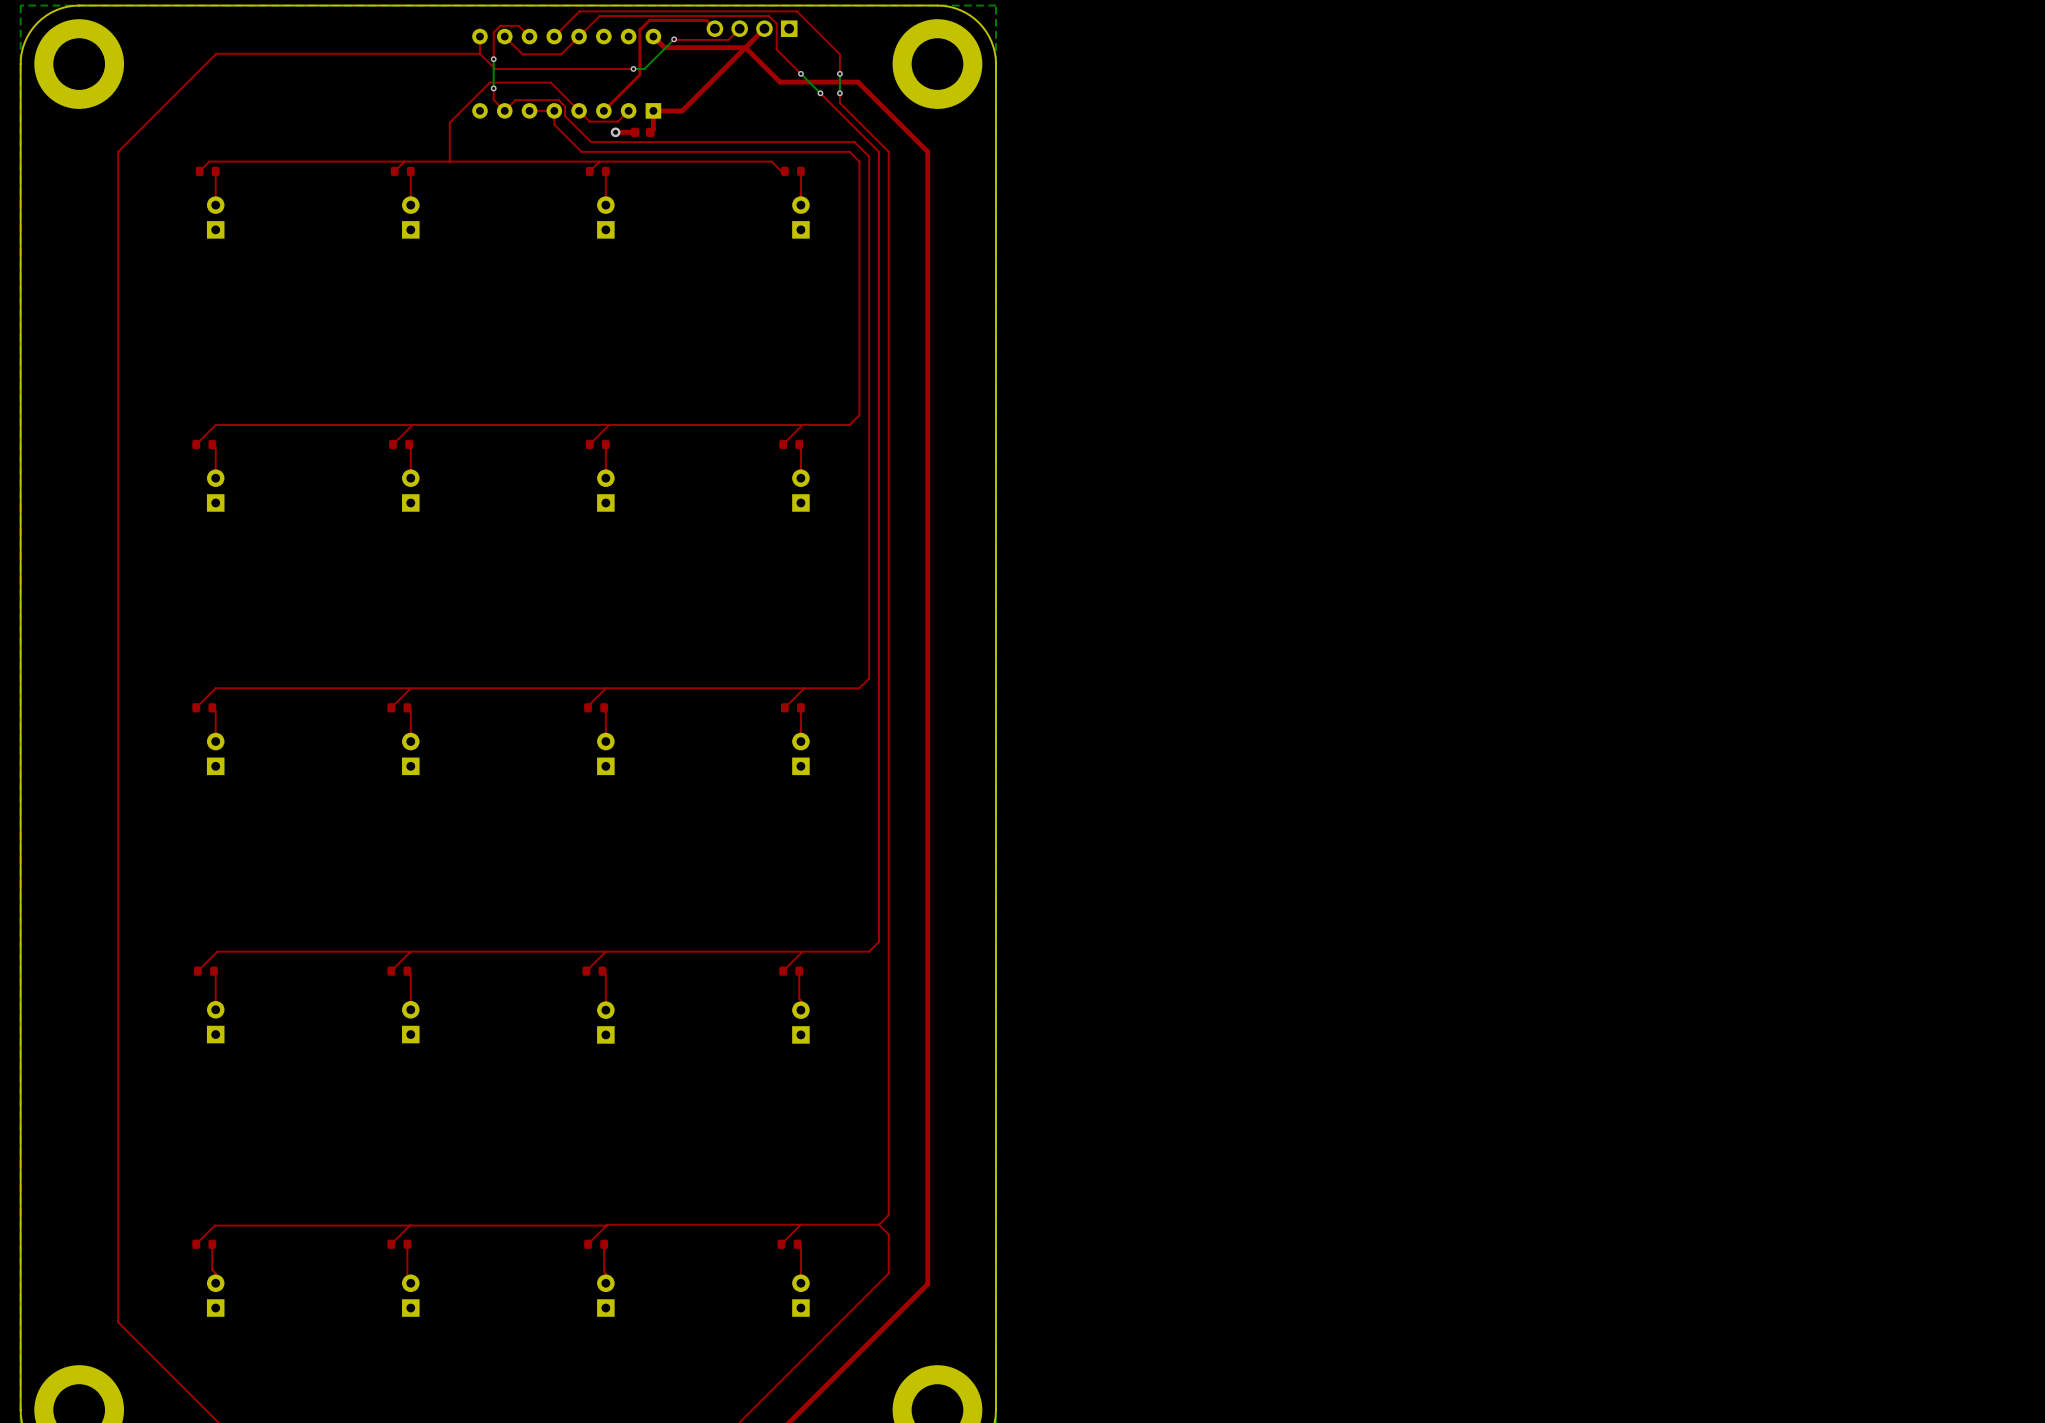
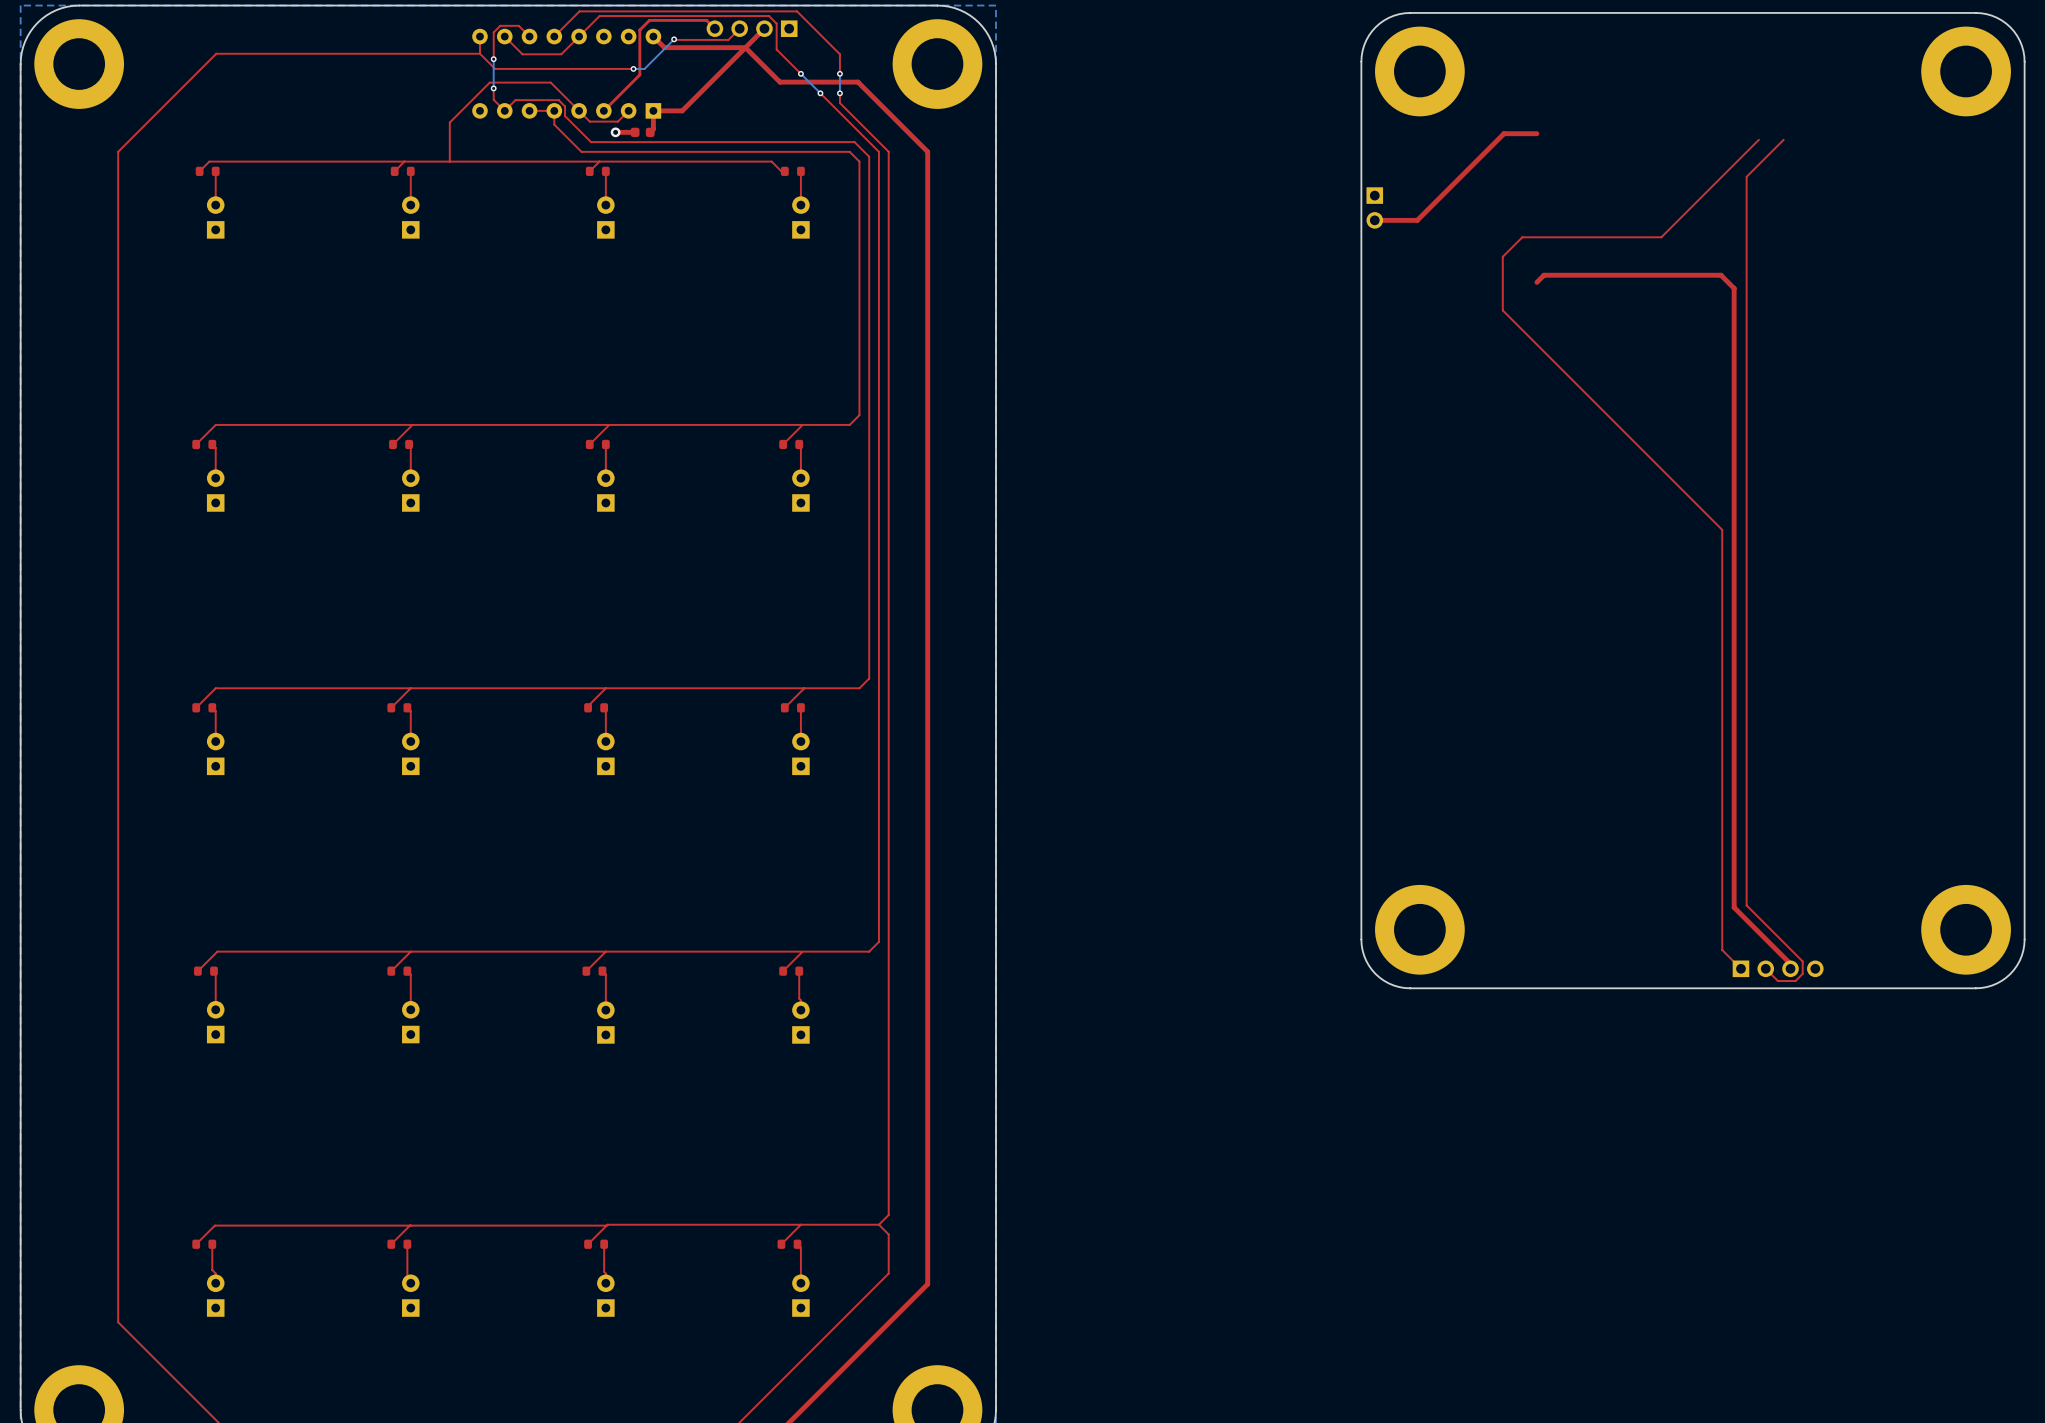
board edge: none -> (1975, 12) (1410, 12) (1399, 14) (1384, 20) (1368, 35) (1364, 45) (1361, 61) (1361, 939) (1362, 950) (1368, 965) (1384, 980) (1394, 985) (1410, 988) (1975, 988) (1986, 987) (2001, 980) (2017, 965) (2023, 950) (2024, 939) (2024, 61) (2019, 40) (2010, 27) (1997, 17) (1975, 12)
part: none -> (1419, 71)
part: none -> (1966, 71)
top track: none -> (1536, 133) (1503, 133) (1417, 220) (1374, 220)
top track: none -> (1758, 139) (1661, 237) (1522, 237) (1502, 256) (1502, 310) (1722, 529) (1722, 950) (1740, 968)
top track: none -> (1783, 139) (1746, 176) (1746, 905) (1802, 961) (1802, 973) (1795, 980) (1777, 980) (1765, 968)
part: none -> (1374, 207)
top track: none -> (1536, 282) (1544, 275) (1720, 275) (1734, 288) (1734, 907) (1790, 963) (1790, 968)
part: none -> (1419, 929)
part: none -> (1966, 929)
part: none -> (1778, 968)

